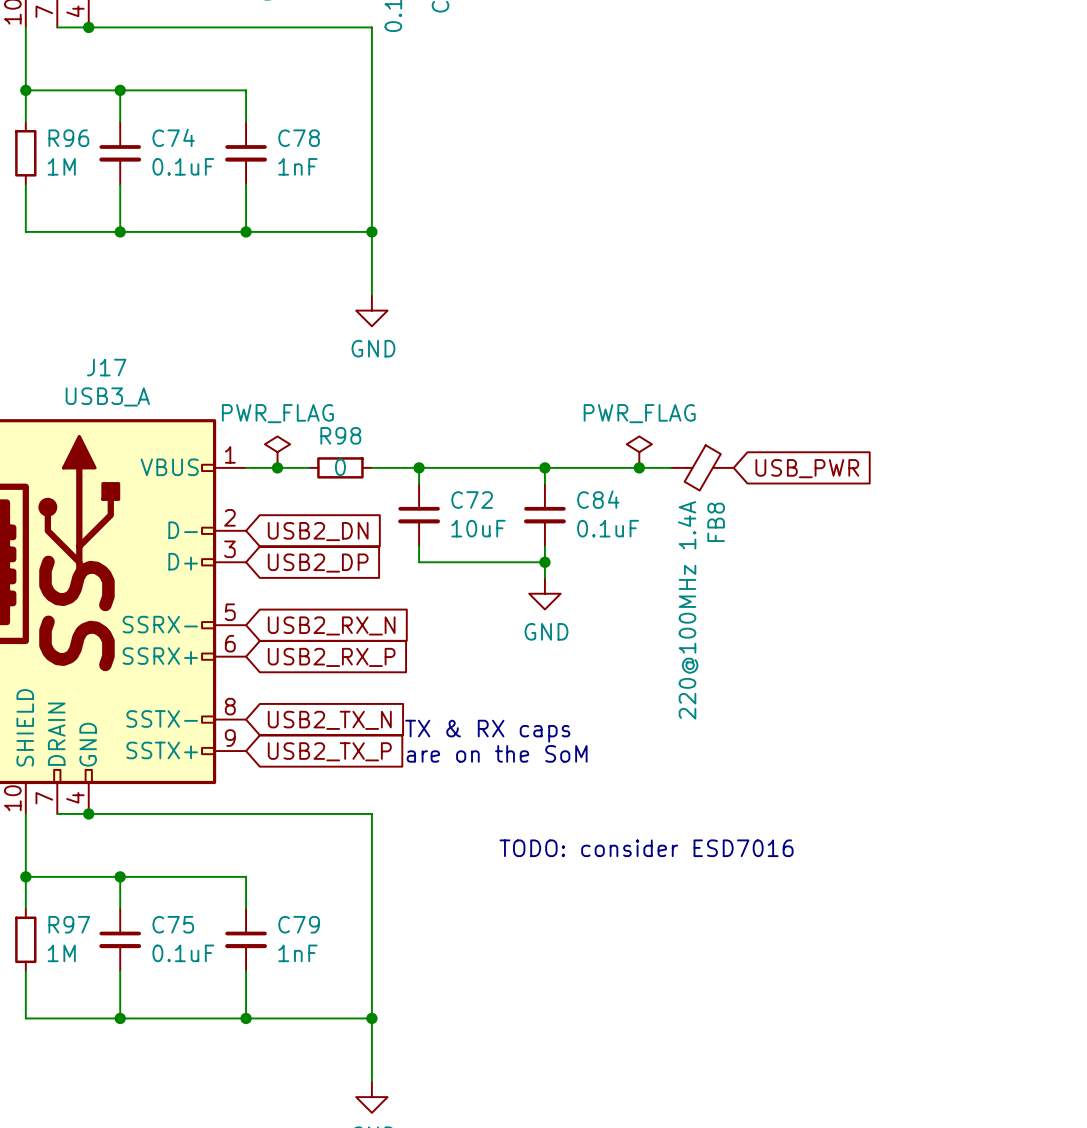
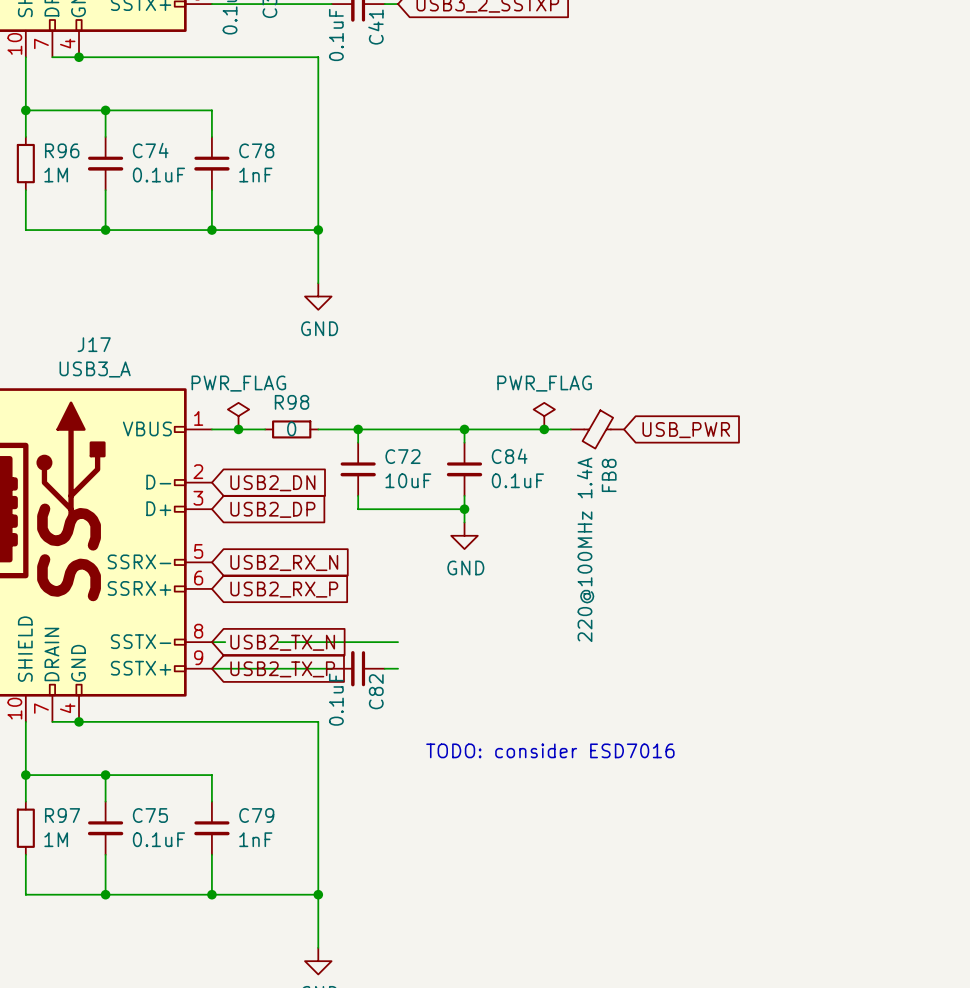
wire: none -> (211, 642) (225, 642)
wire: none -> (278, 642) (398, 642)
text: TX & RX caps (487, 731) -> none
wire: none -> (211, 668) (331, 668)
C82: none -> 0.1uF (358, 668)
wire: none -> (384, 668) (398, 668)
text: are on the SoM (497, 753) -> none

